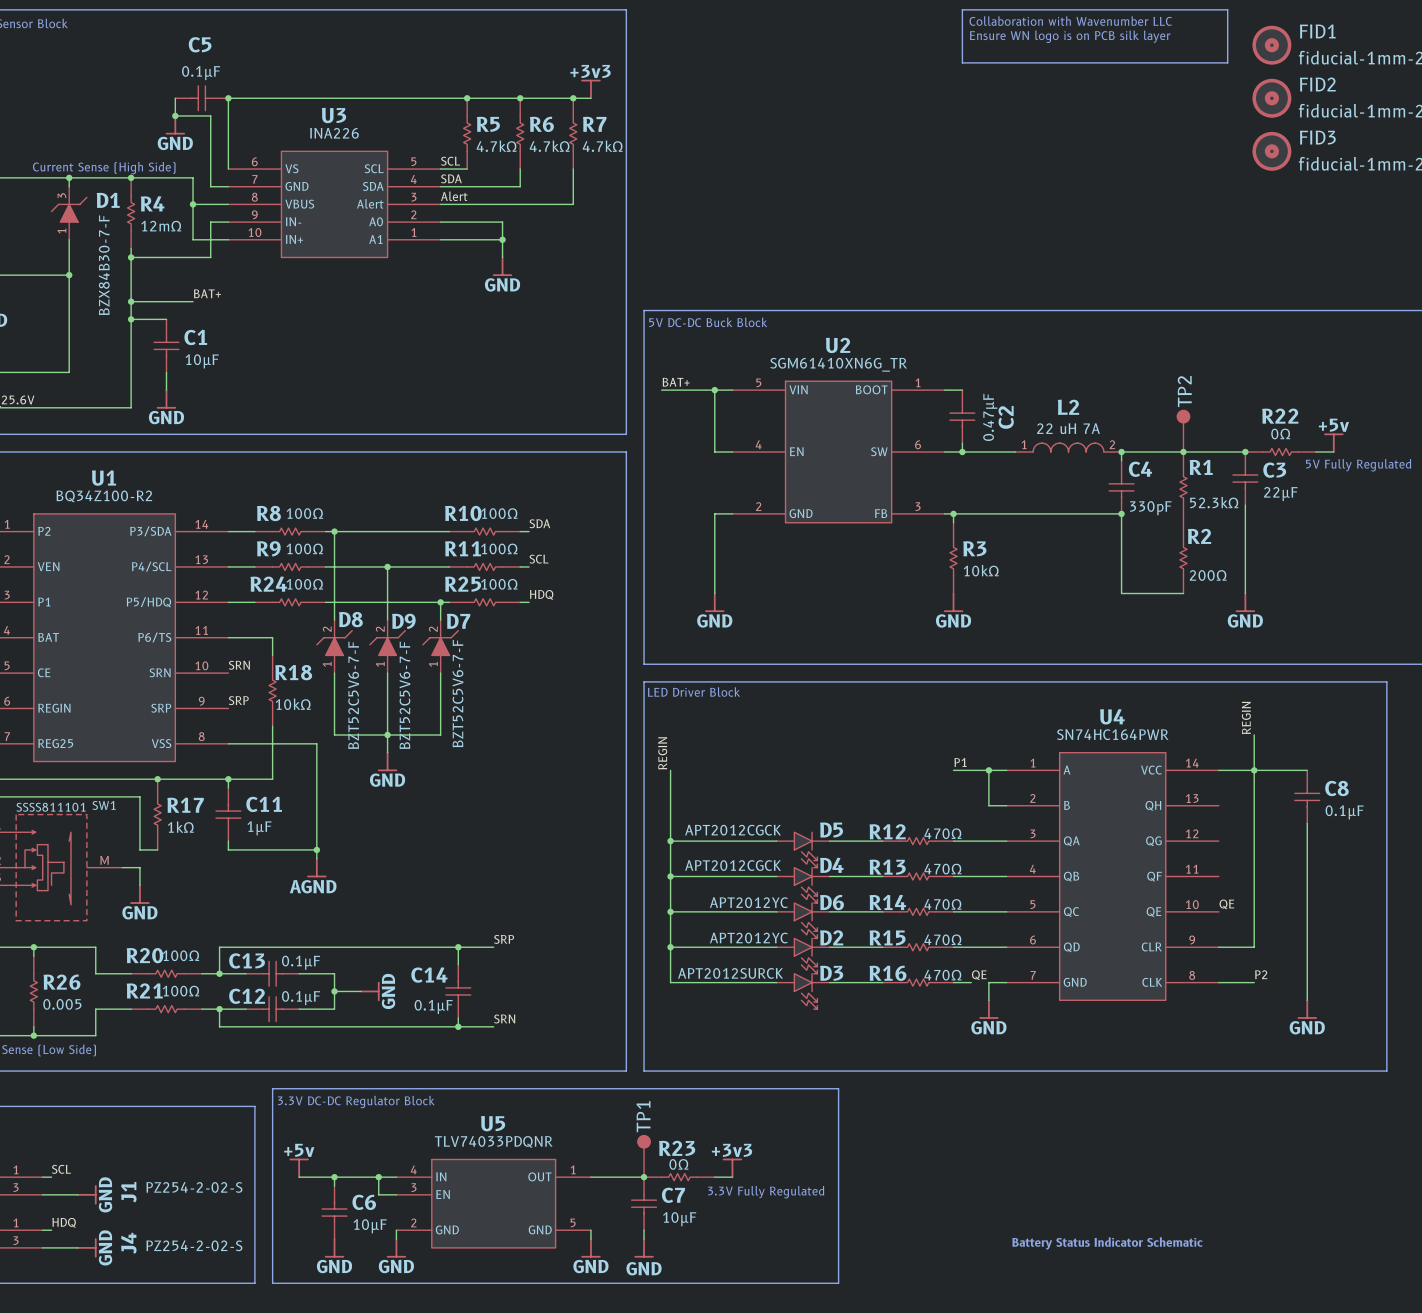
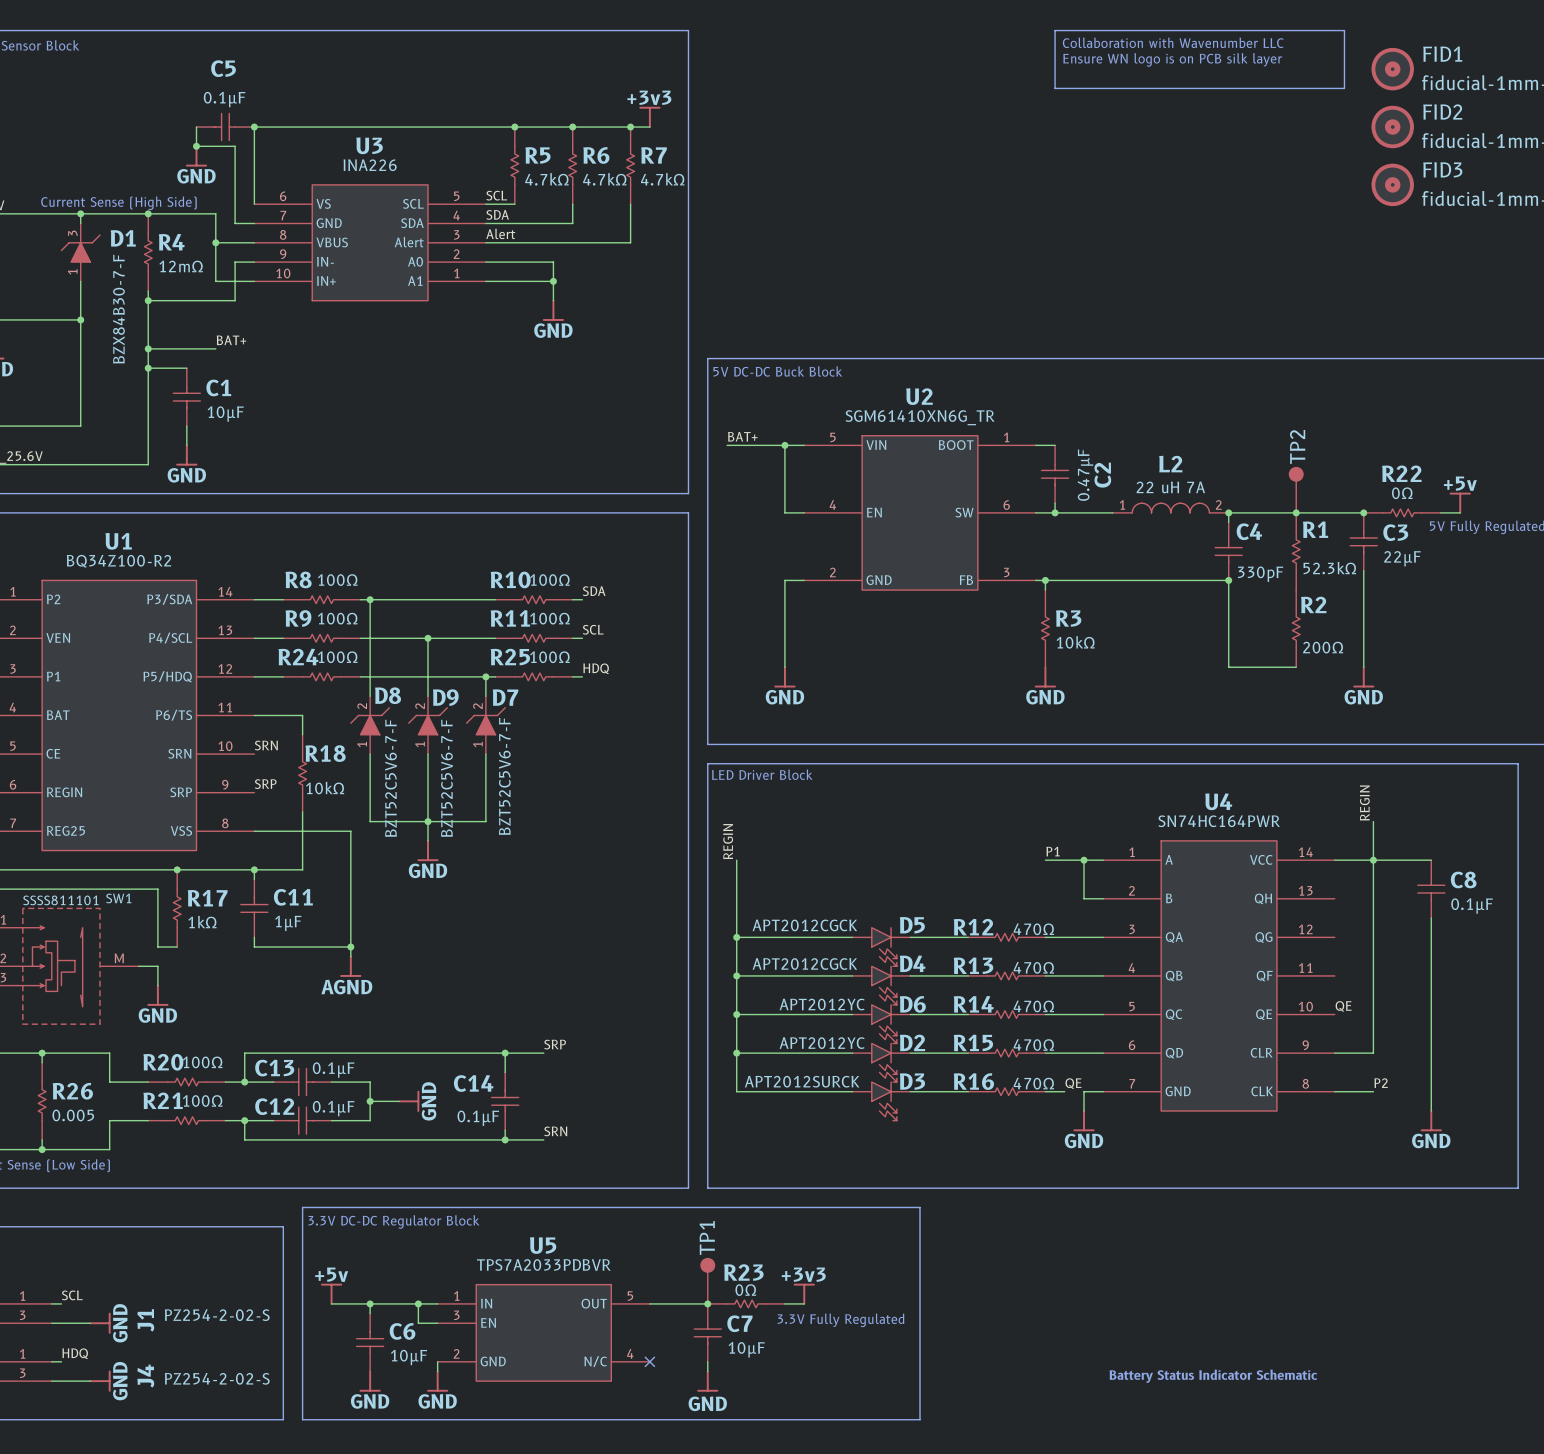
U5 value: TLV74033PDQNR (493, 1141) -> TPS7A2033PDBVR (543, 1265)
U5 pin number: 4 (413, 1169) -> 1 (456, 1295)
U5 pin number: 1 (573, 1169) -> 5 (630, 1296)
U5 pin number: 5 (573, 1222) -> 4 (630, 1353)
U5 pin name: GND (540, 1229) -> N/C (595, 1361)
wire: (590, 1230) (590, 1239) -> none
no-connect mark: none -> (649, 1361)
power symbol: GND (590, 1247) -> none

